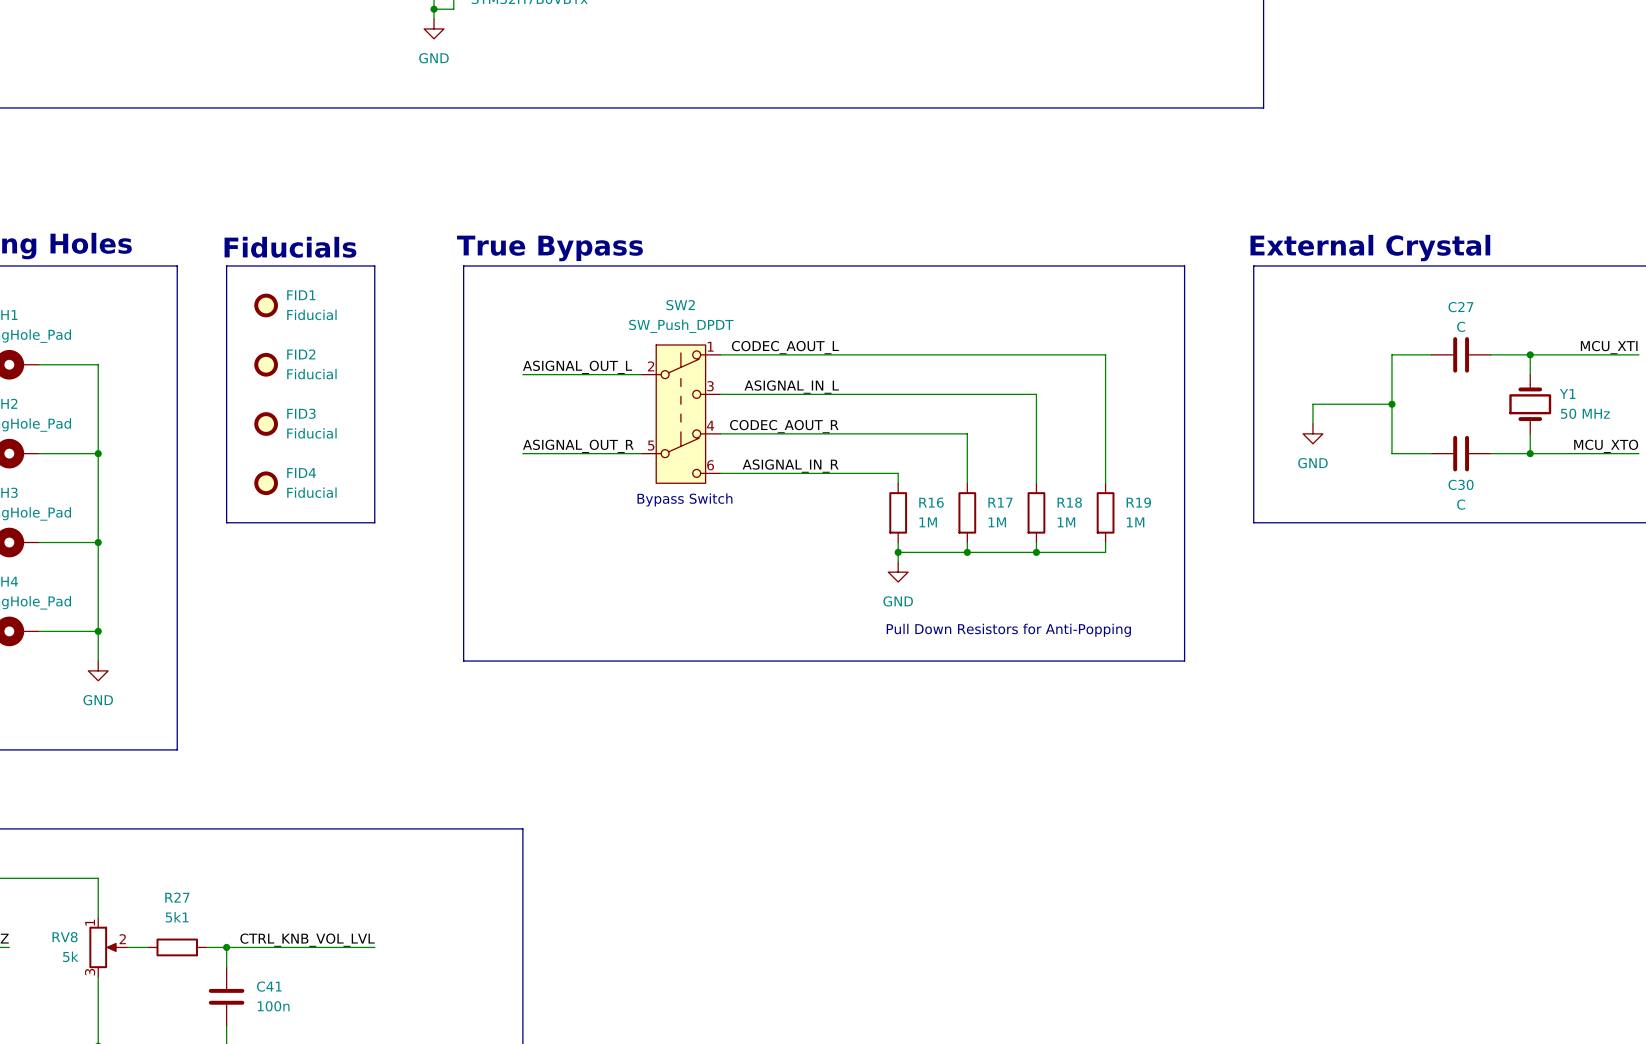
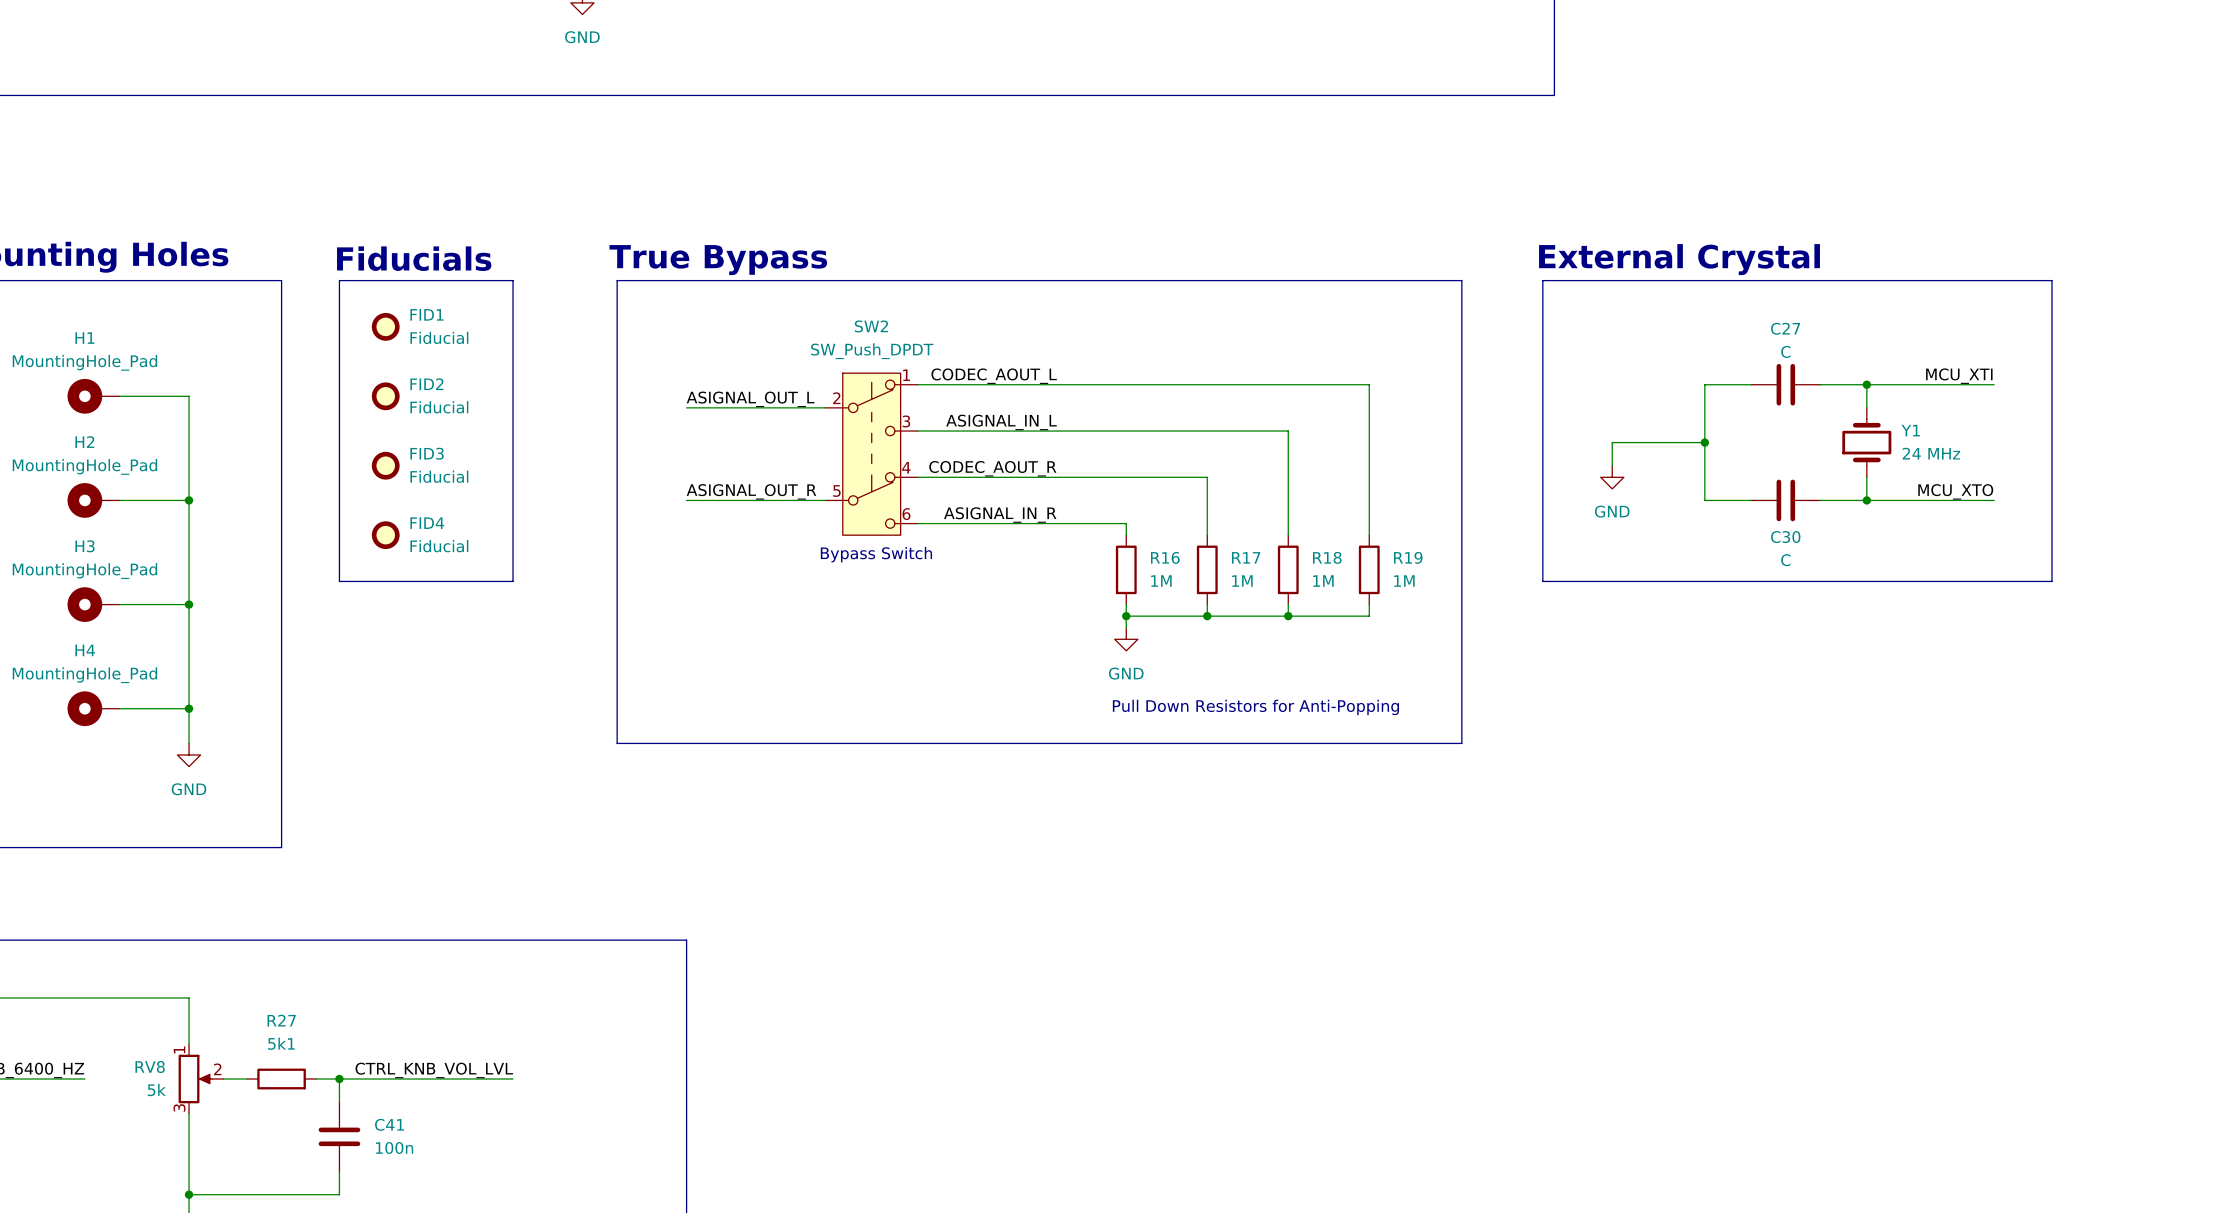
Y1 value: 50 MHz (1585, 413) -> 24 MHz (1931, 453)

